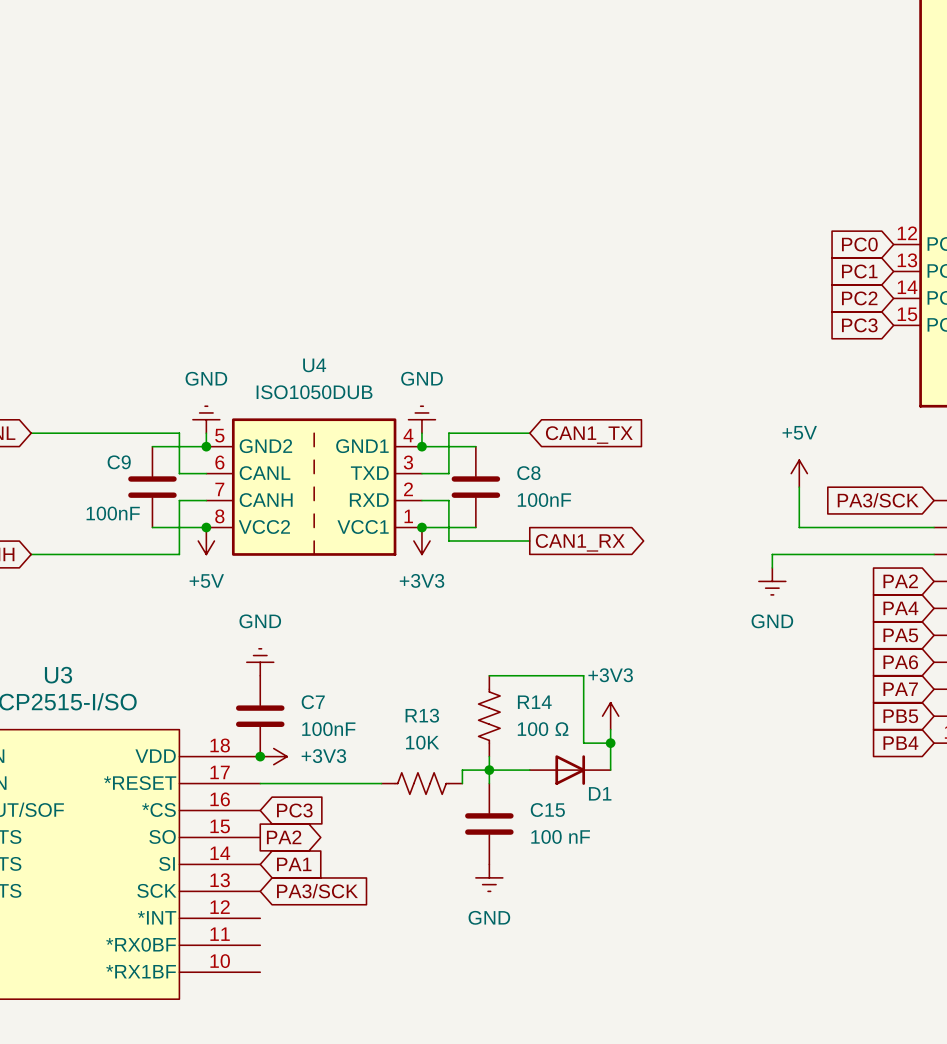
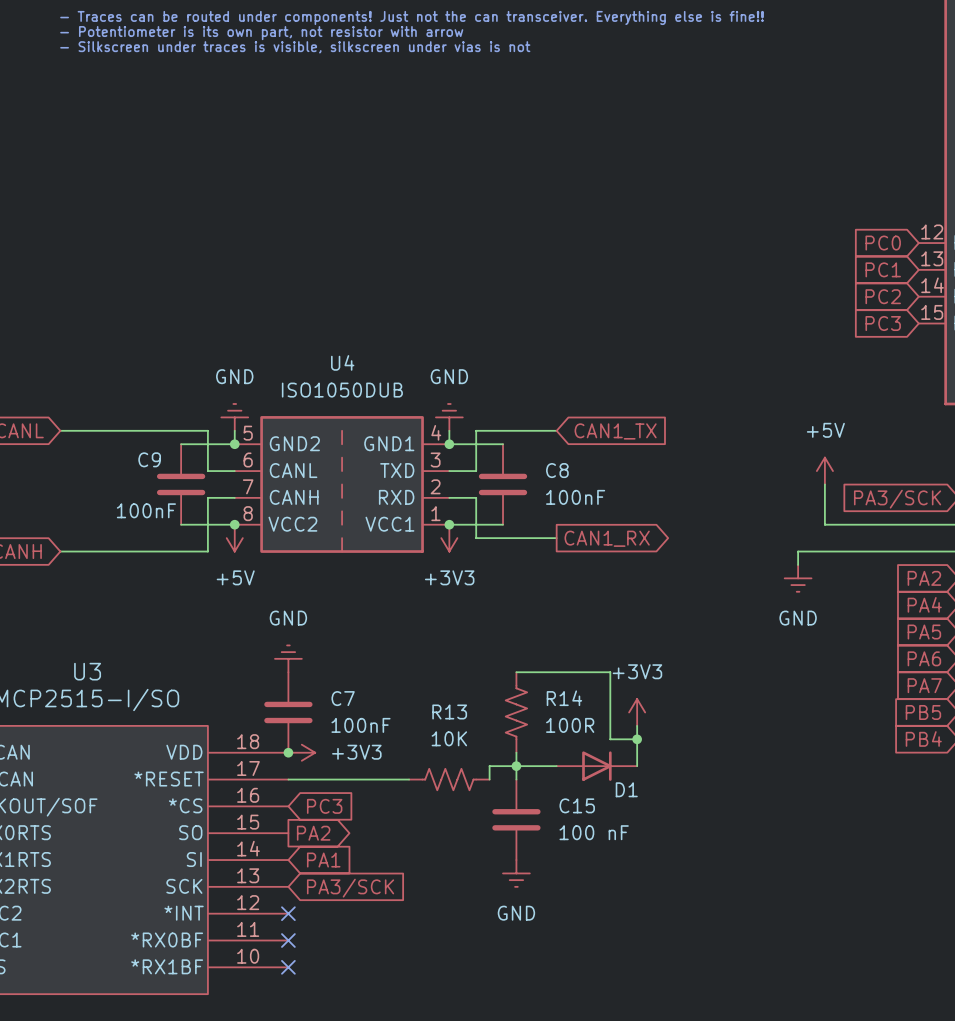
text: none -> - Traces can be routed under components! Just not the can transceiver. Everything else is fine!! (411, 17)
text: none -> - Potentiometer is its own part, not resistor with arrow (261, 33)
text: none -> - Silkscreen under traces is visible, silkscreen under vias is not (295, 47)
R14 value: 100 Ω (543, 729) -> 100R (570, 725)
no-connect mark: none -> (288, 913)
no-connect mark: none -> (288, 940)
no-connect mark: none -> (288, 967)

